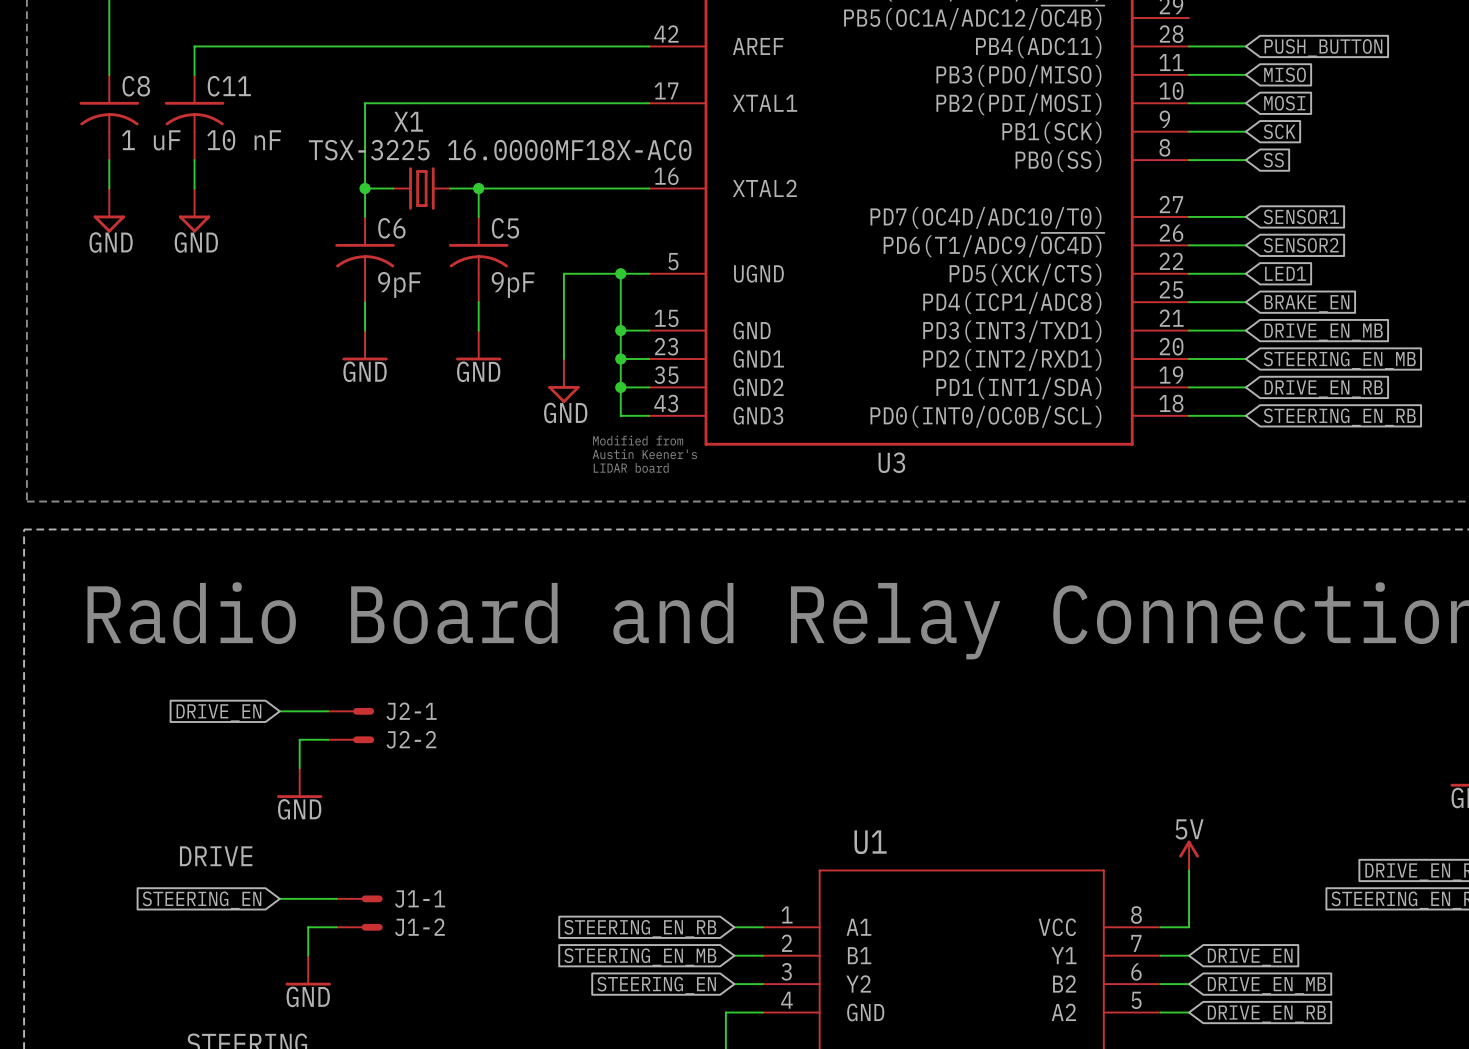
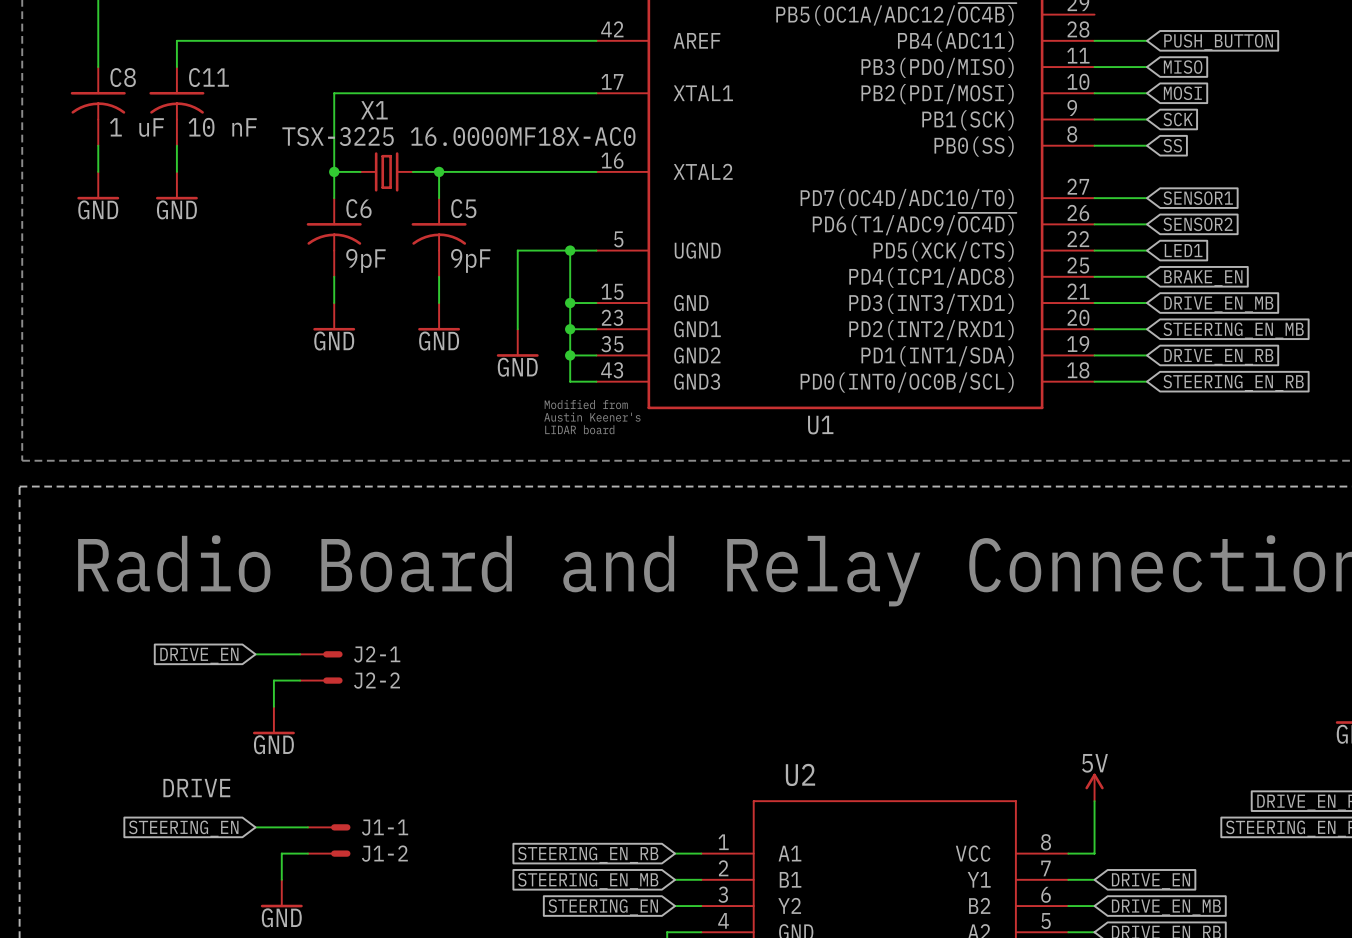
power symbol shape: [93, 188, 125, 233] -> [77, 171, 120, 200]
power symbol shape: [178, 188, 211, 233] -> [155, 171, 198, 200]
power symbol shape: [548, 359, 580, 404] -> [496, 329, 539, 357]
U3 name: U3 (891, 462) -> U1 (820, 425)
U1 name: U1 (870, 842) -> U2 (800, 774)

